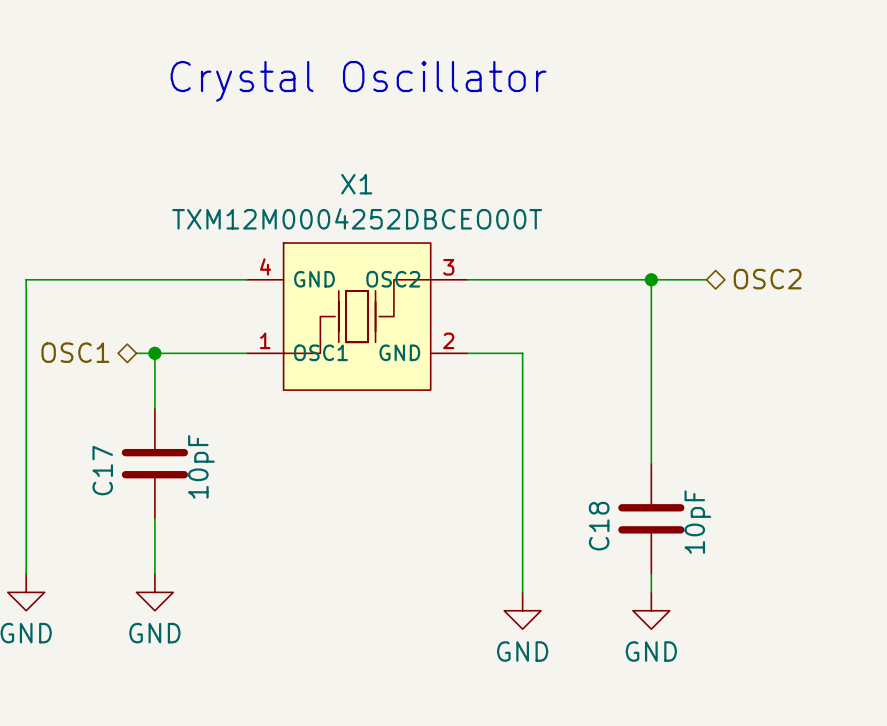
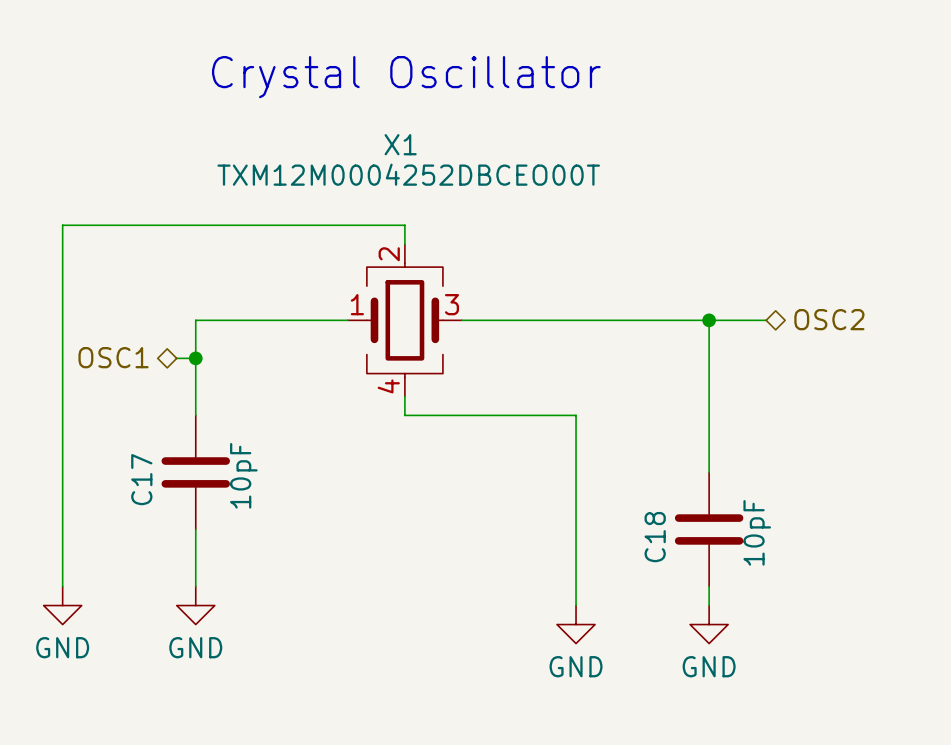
X1 name position: X1 (356, 184) -> X1 (400, 144)
X1 value position: TXM12M0004252DBCEO00T (357, 218) -> TXM12M0004252DBCEO00T (408, 174)
X1 symbol: [246, 243, 468, 391] -> [347, 244, 462, 397]
wire: (26, 279) (246, 279) -> (62, 282) (62, 225) (404, 225) (404, 244)
wire: (467, 279) (706, 279) -> none
wire: (651, 279) (651, 316) -> none
junction position: (651, 279) -> (709, 320)
hierarchical label position: OSC2 (767, 279) -> OSC2 (829, 319)
wire: none -> (461, 320) (766, 320)
wire: (154, 353) (246, 353) -> (195, 358) (195, 320) (347, 320)
wire: (467, 353) (522, 353) (522, 408) -> (404, 396) (404, 415) (576, 415)

